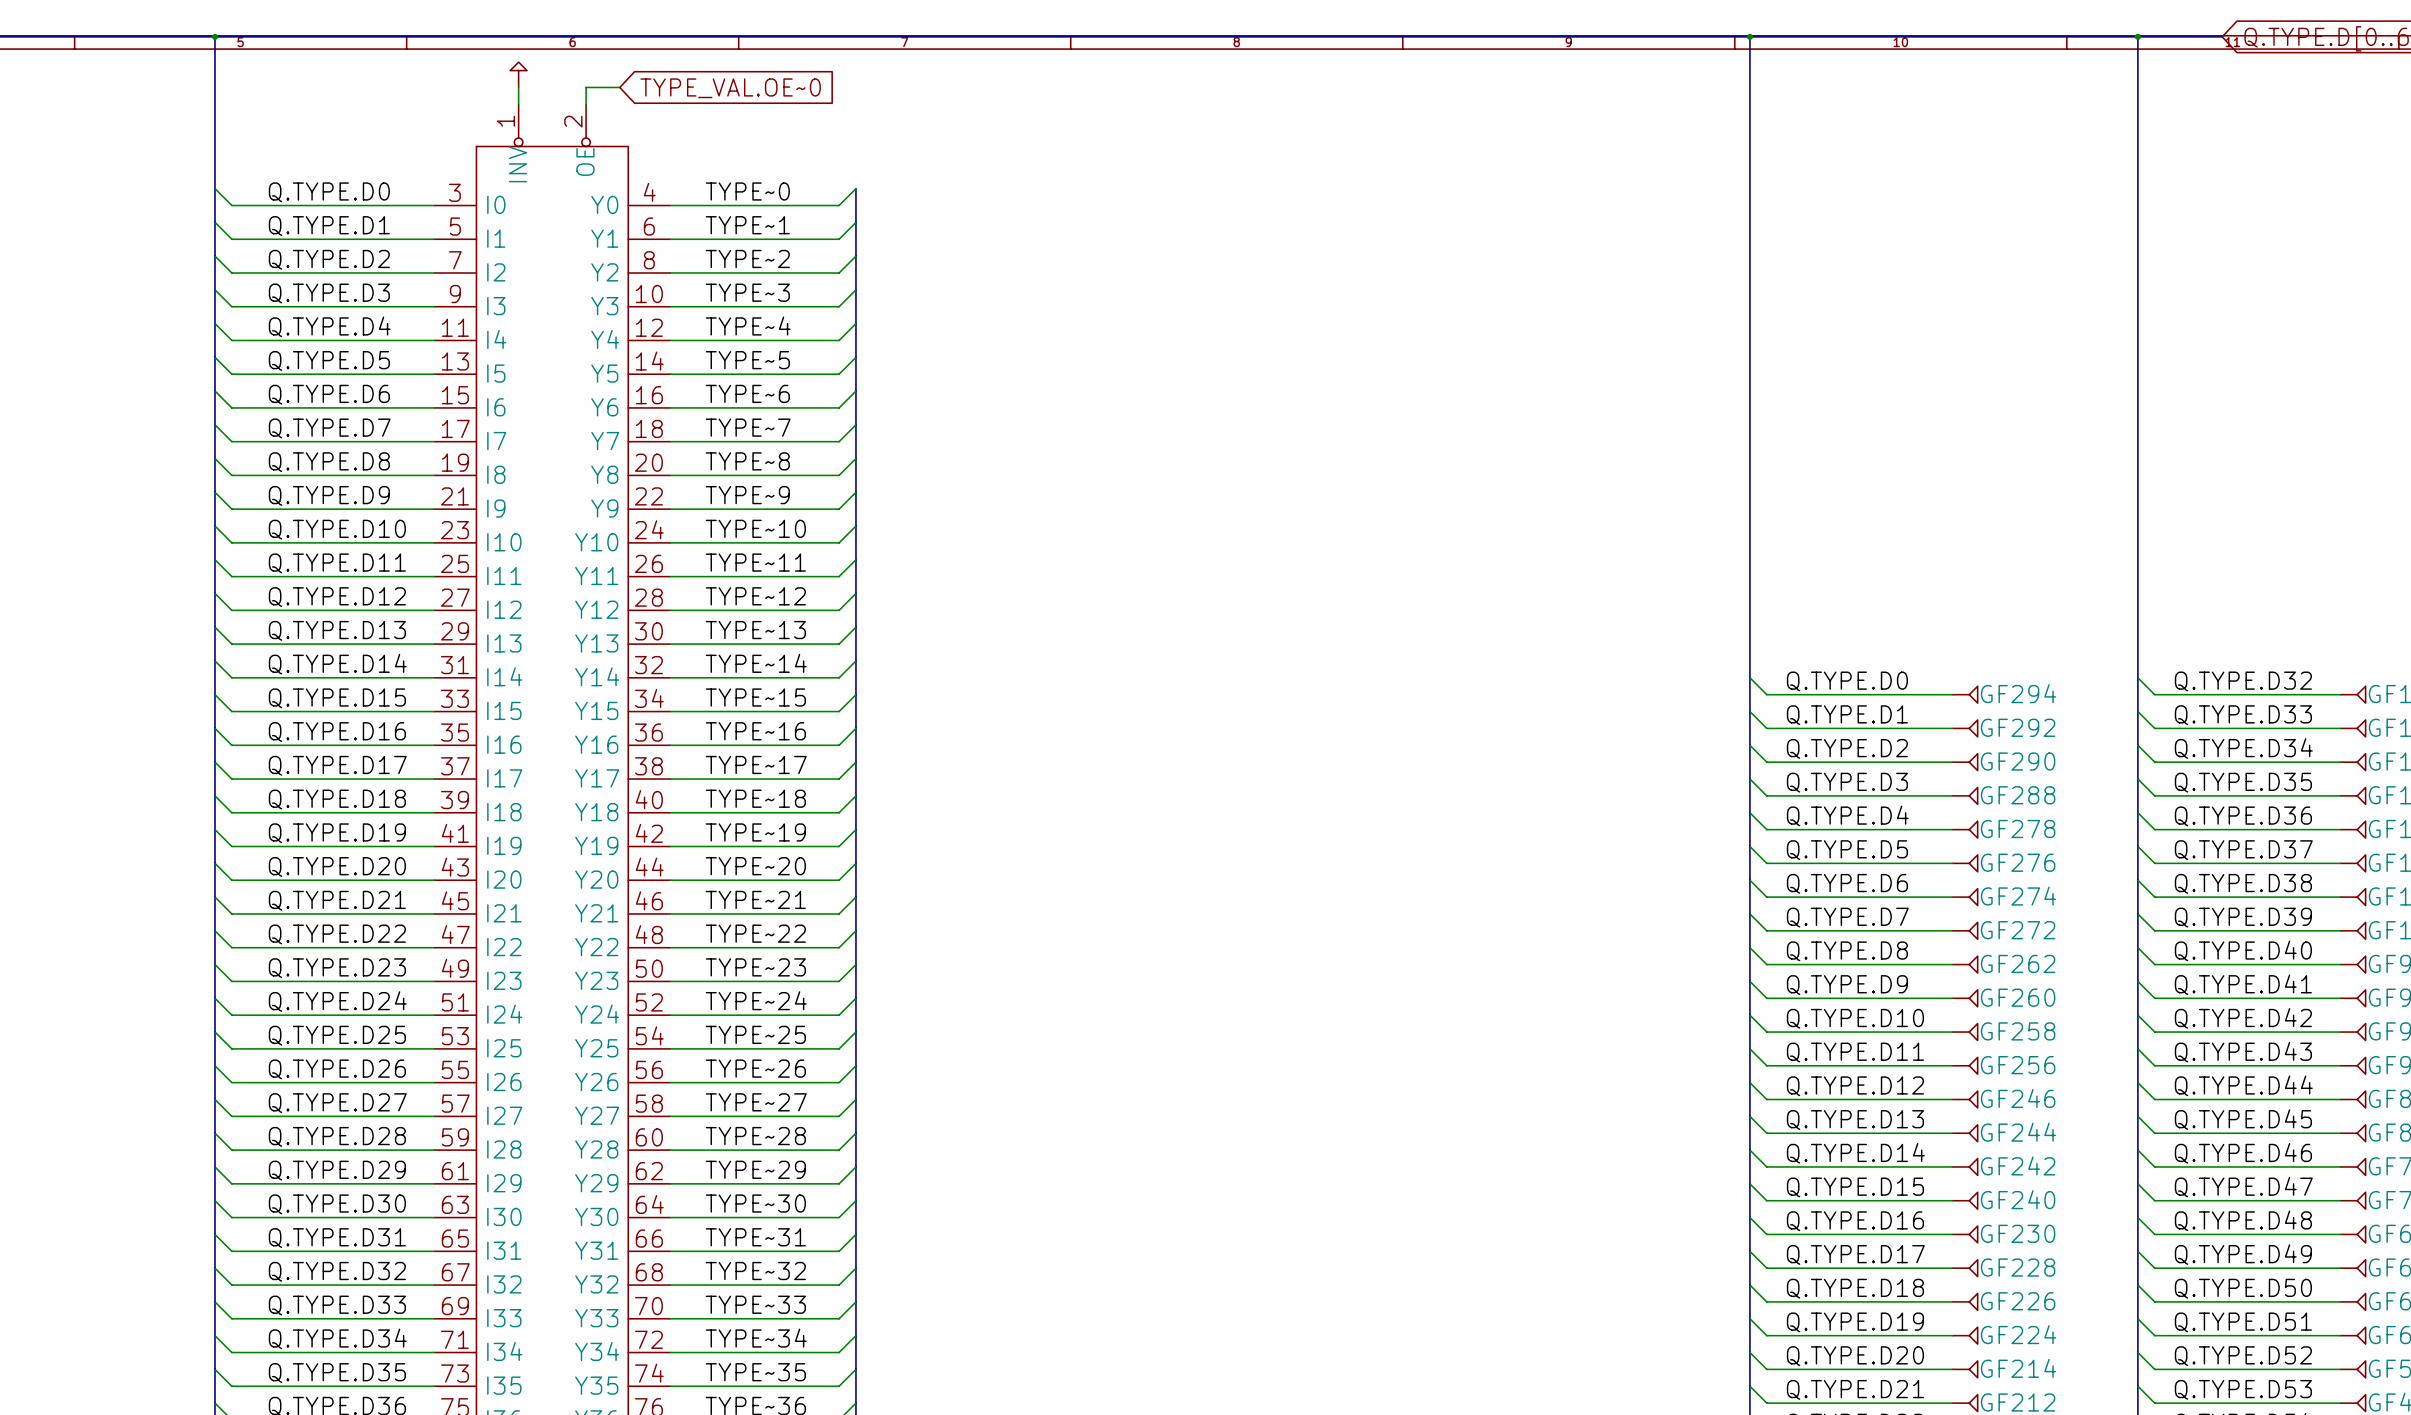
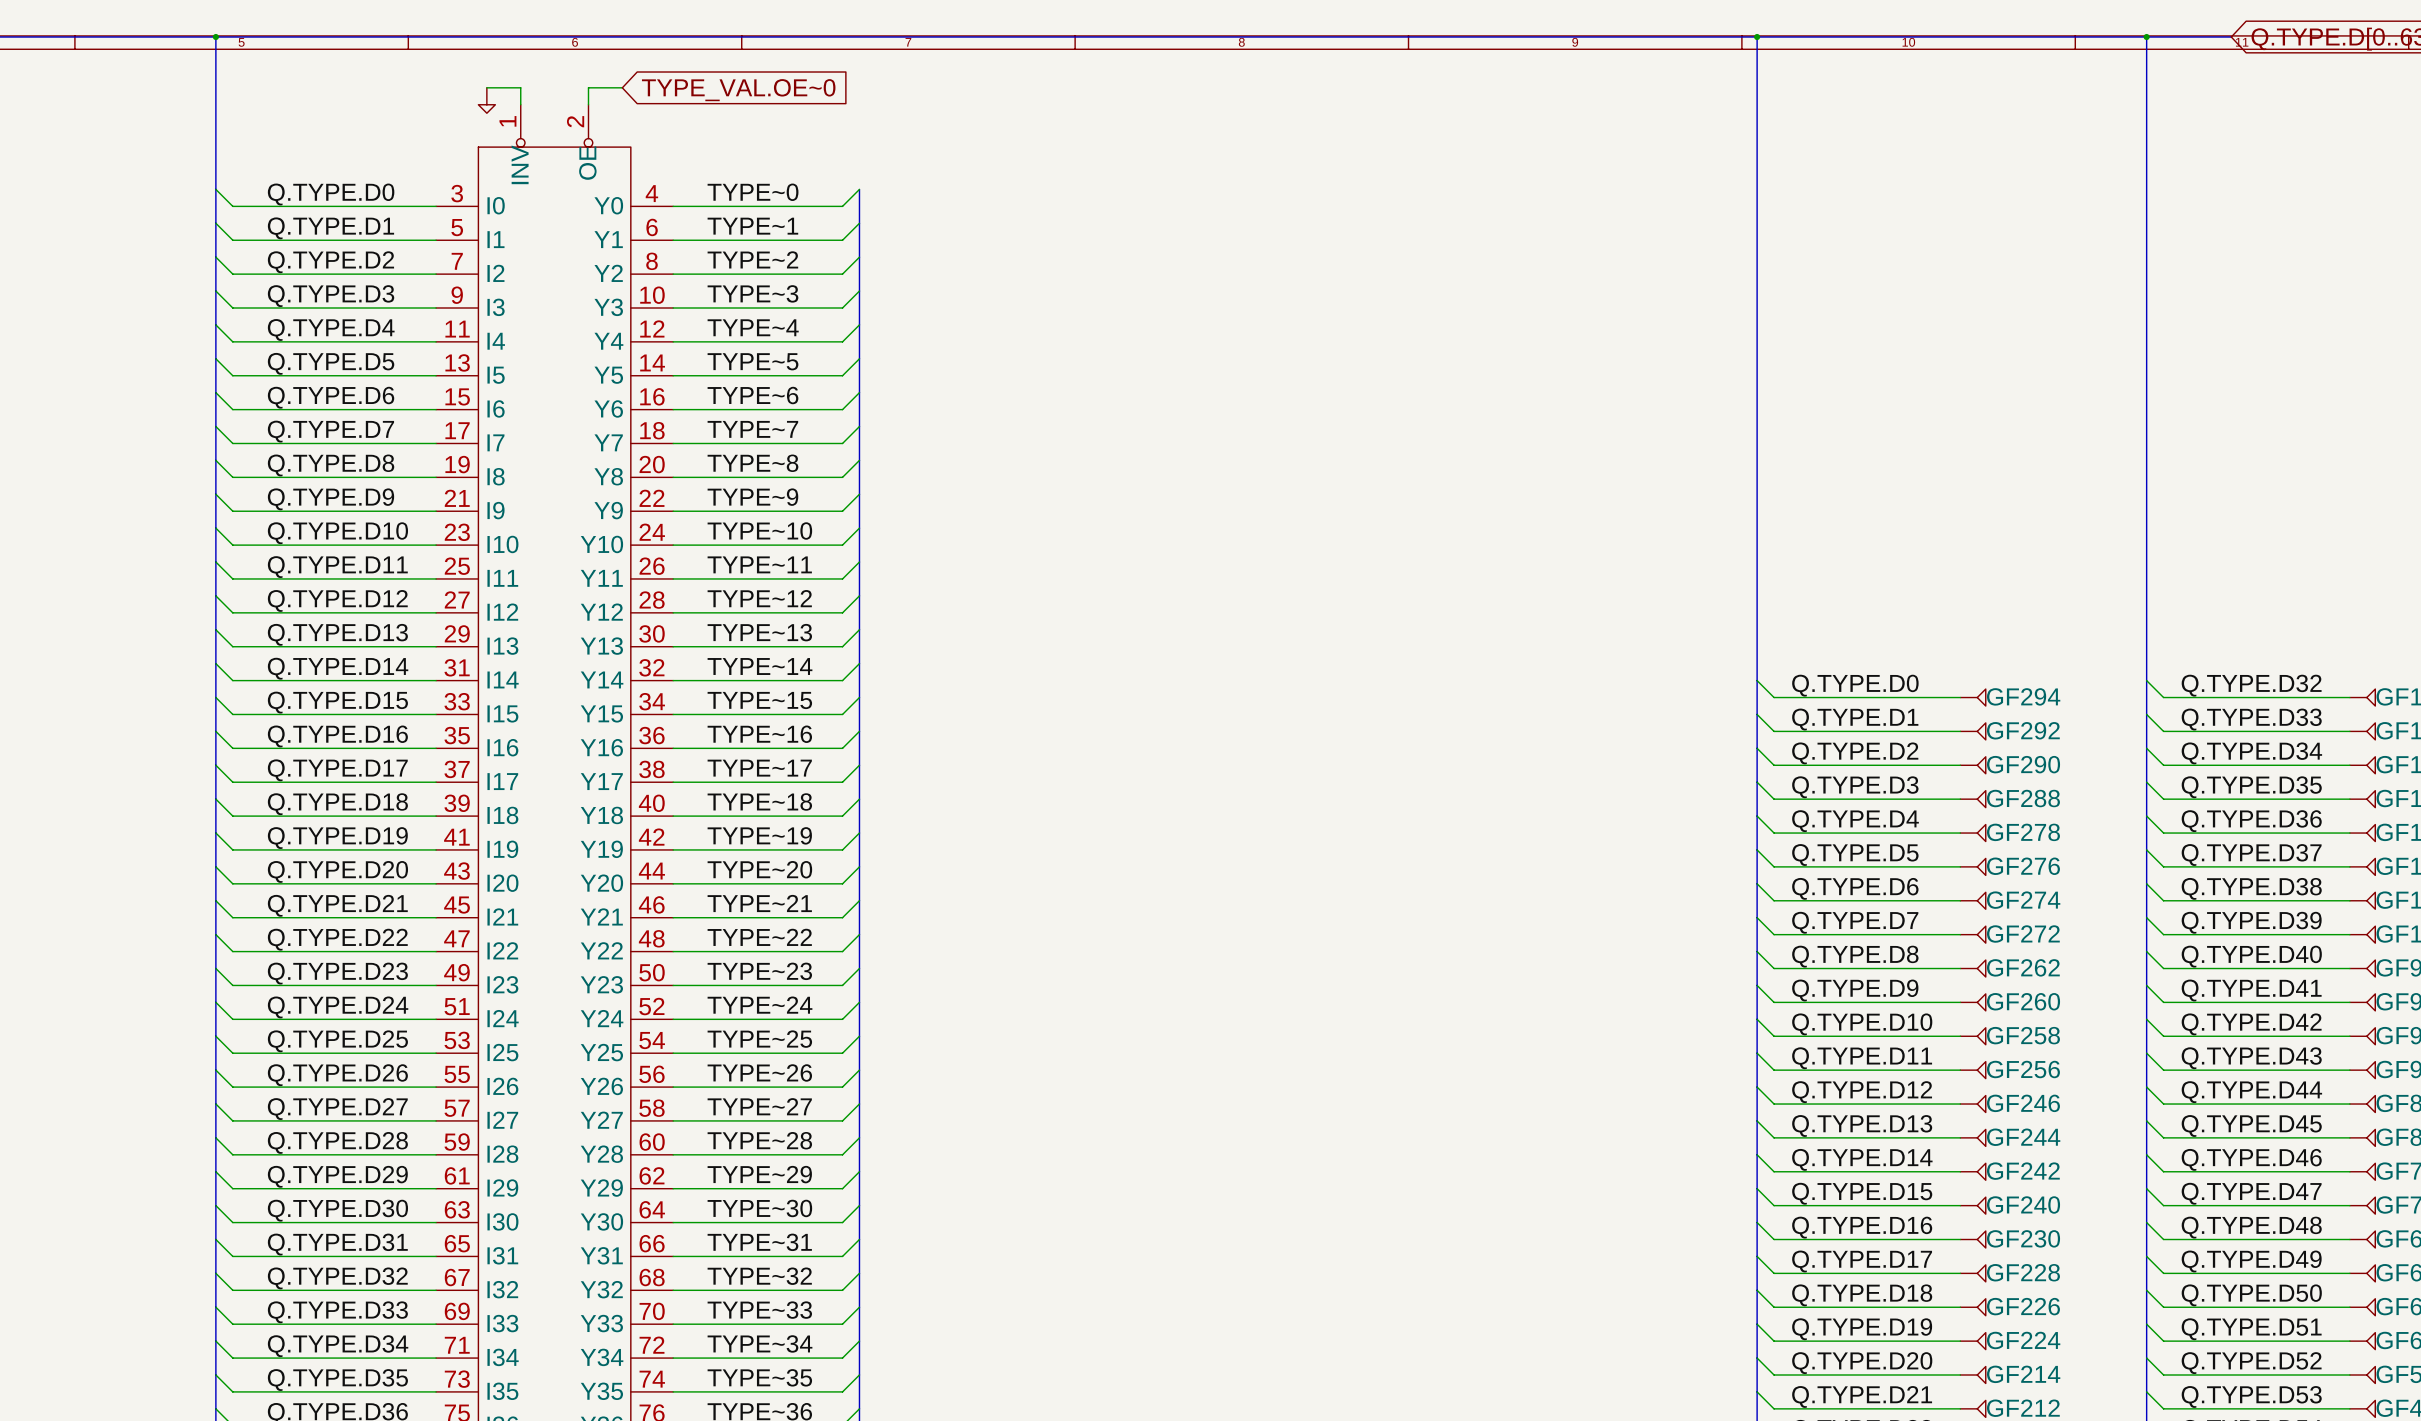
power symbol rotation: 0° (518, 66) -> 180° (486, 108)
power symbol position: (518, 74) -> (486, 100)
wire: none -> (486, 87) (520, 87)

